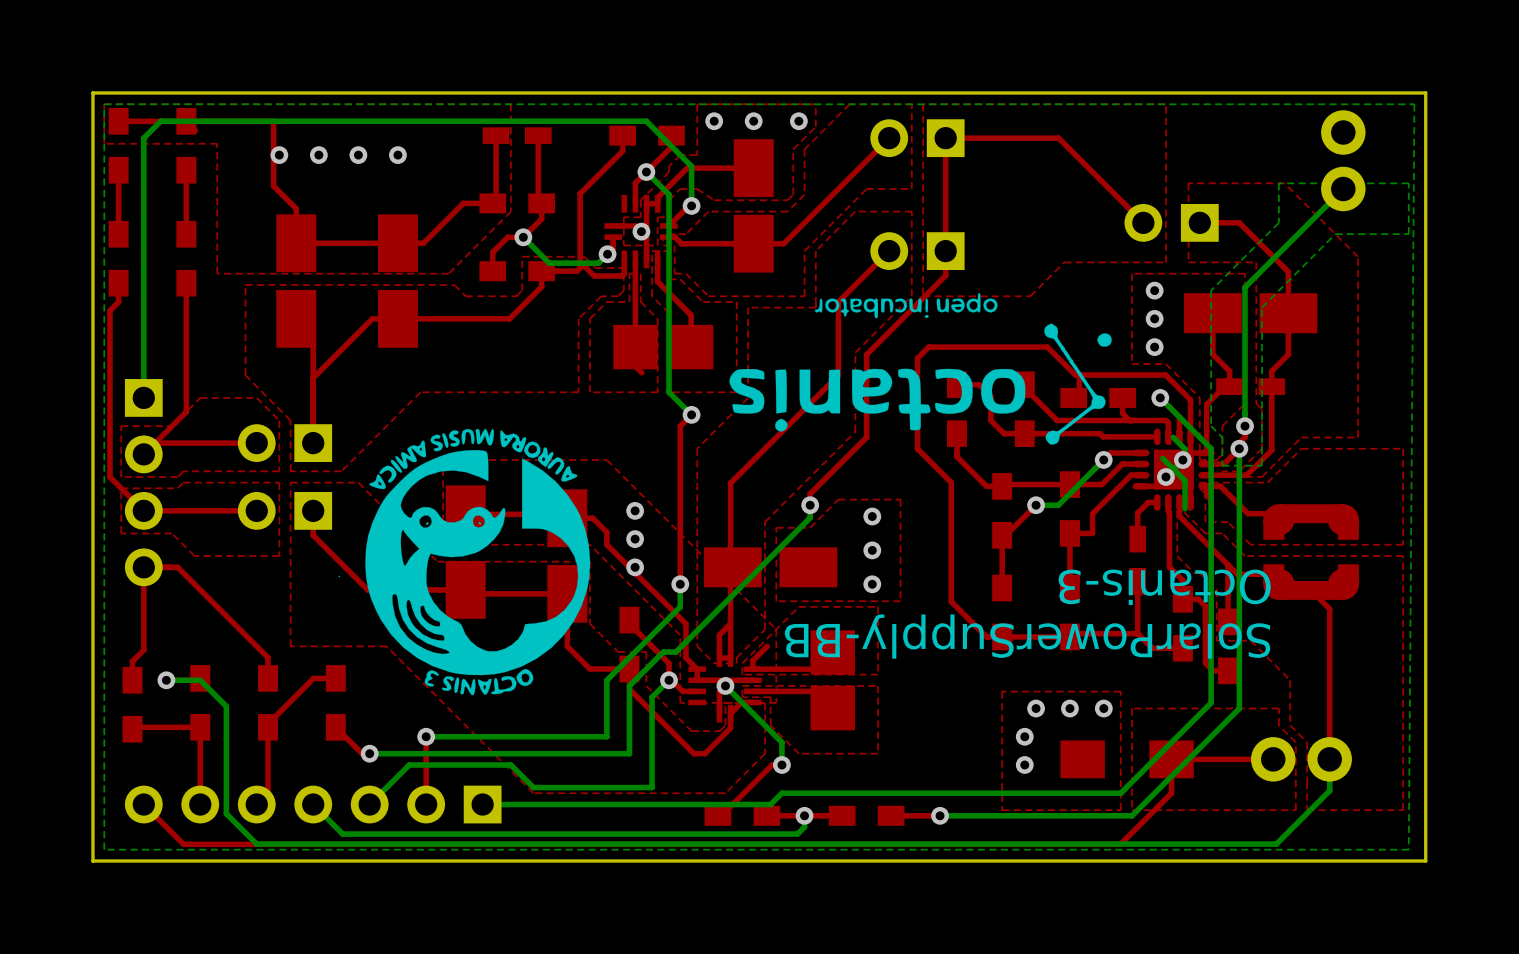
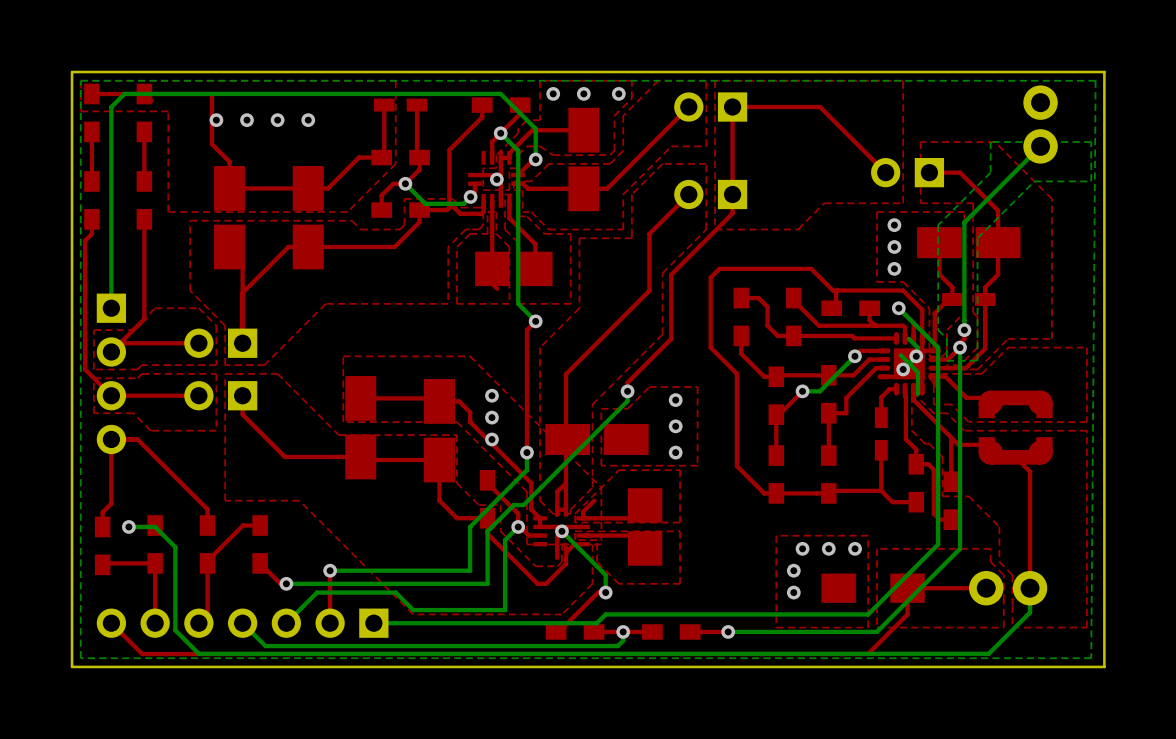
drawing: [729, 292, 1112, 445] -> none
drawing: [338, 428, 591, 696] -> none
text: Octanis-3 (1164, 587) -> none
text: SolarPowerSupply-BB (1027, 636) -> none

